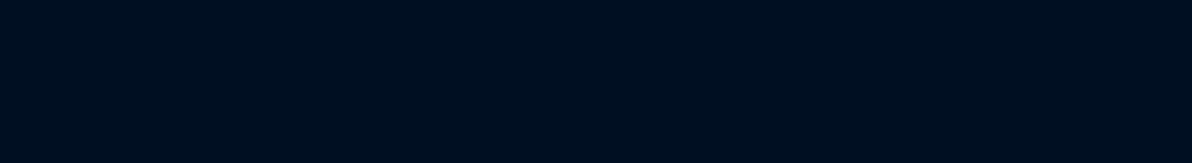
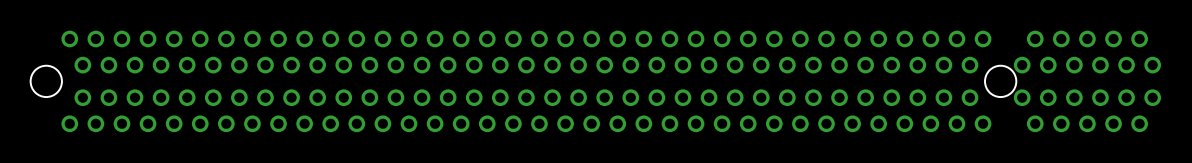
part: none -> (595, 81)

